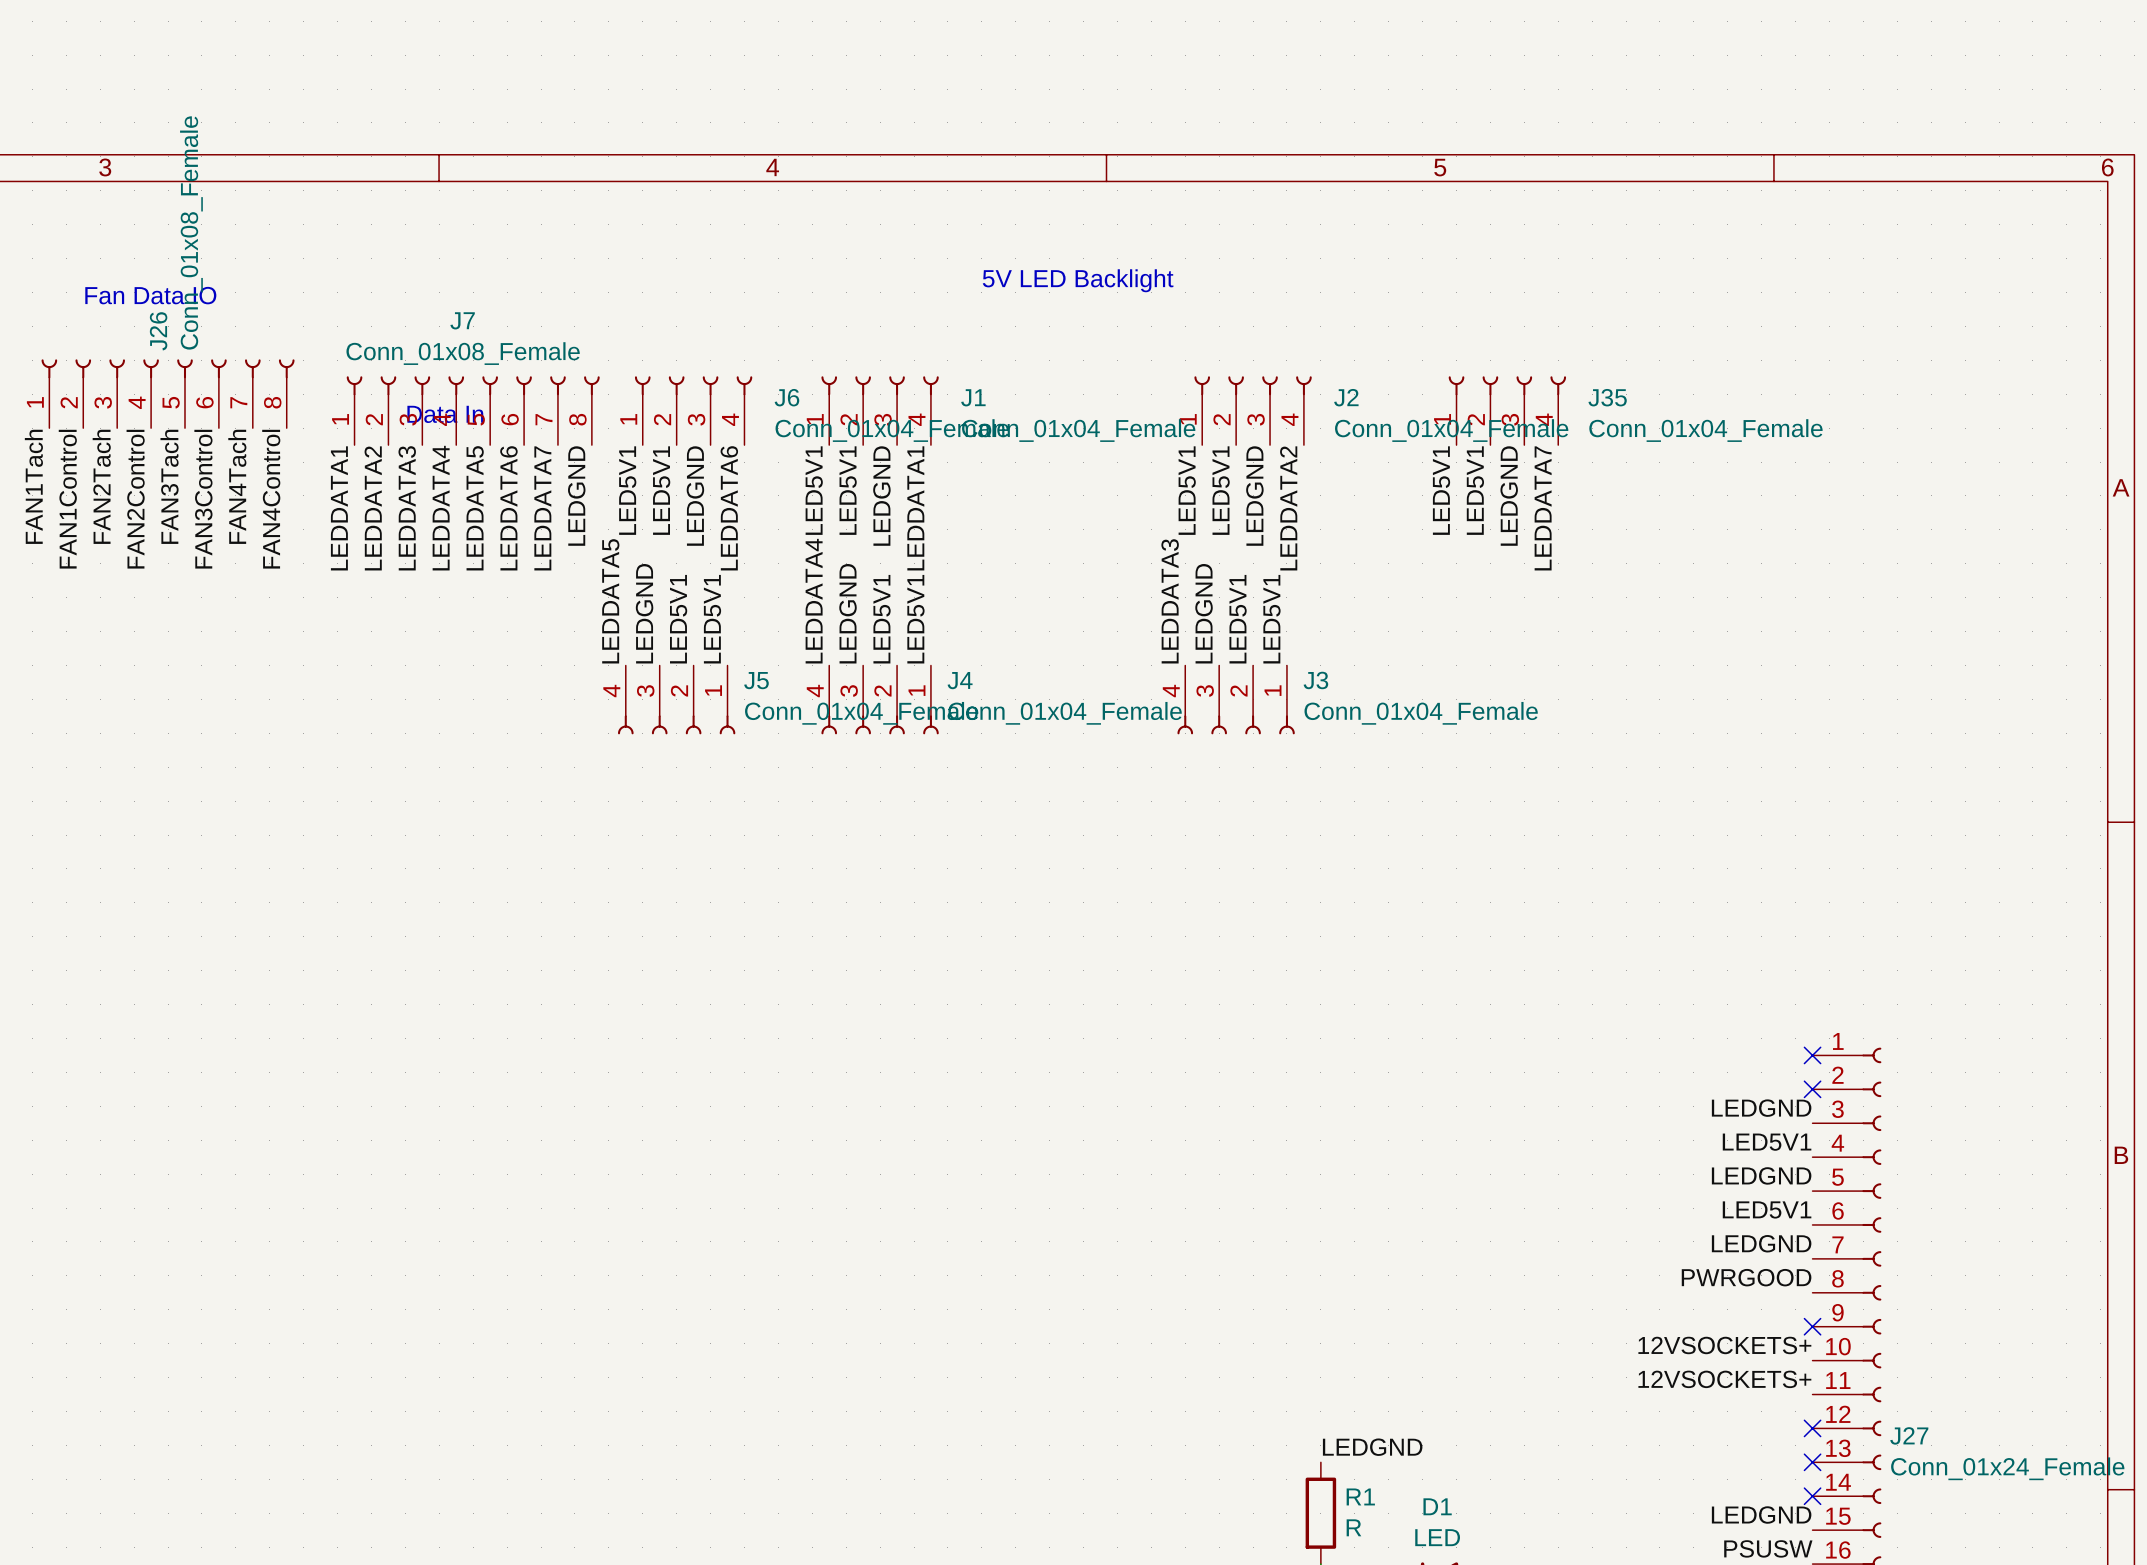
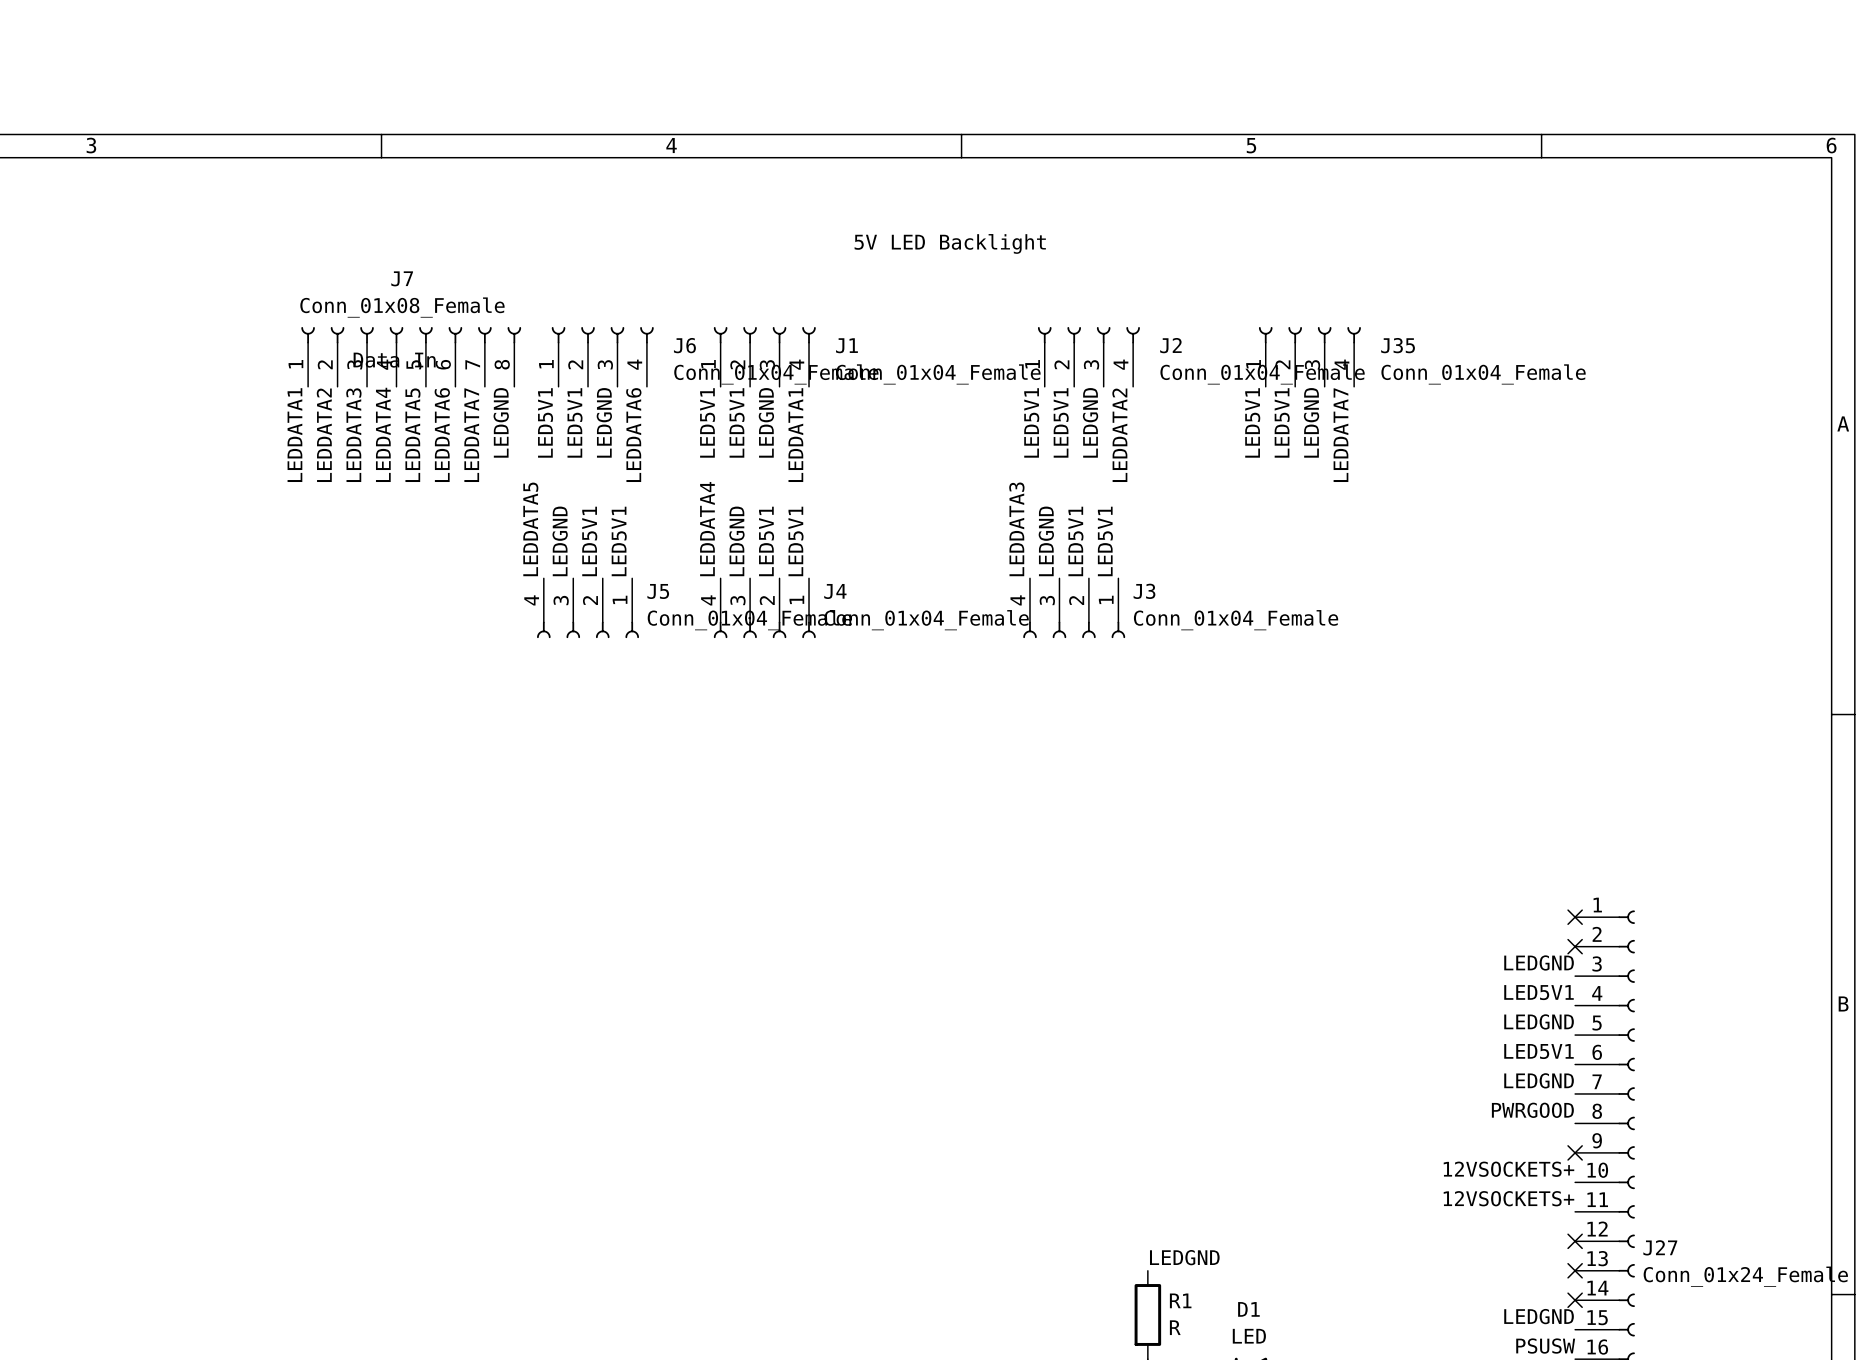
text: Fan Data IO (150, 295) -> none
J26: Conn_01x08_Female (168, 393) -> none
label: FAN1Tach (33, 486) -> none
label: FAN2Tach (101, 486) -> none
label: FAN3Tach (169, 486) -> none
label: FAN4Tach (237, 486) -> none
label: FAN1Control (67, 499) -> none
label: FAN2Control (135, 499) -> none
label: FAN3Control (203, 499) -> none
label: FAN4Control (271, 499) -> none

